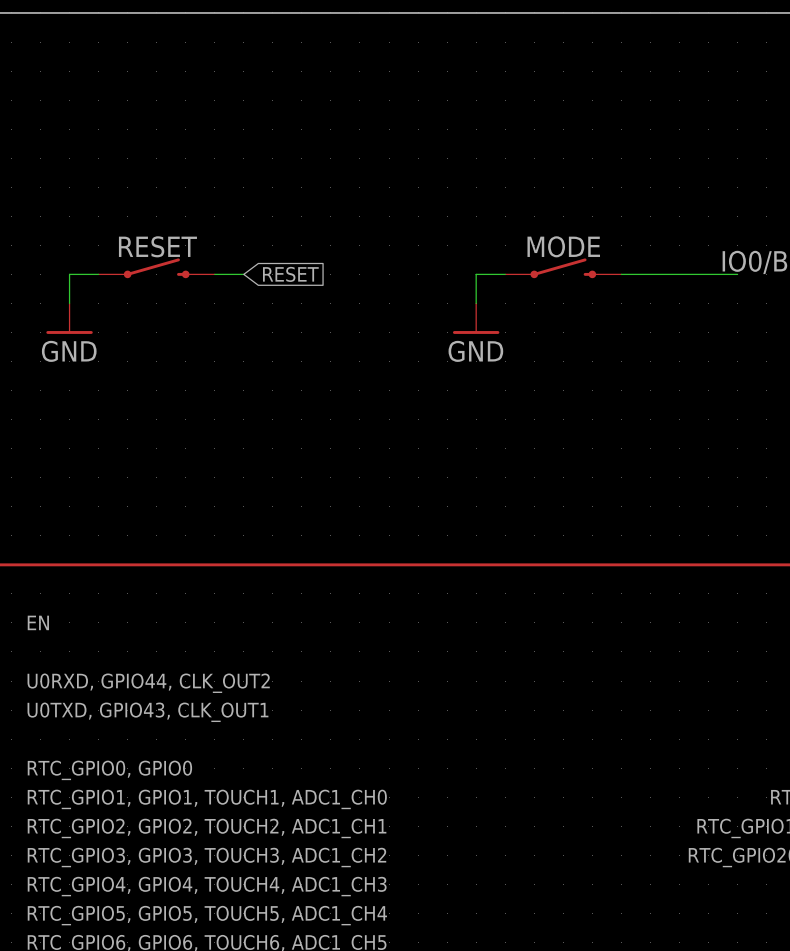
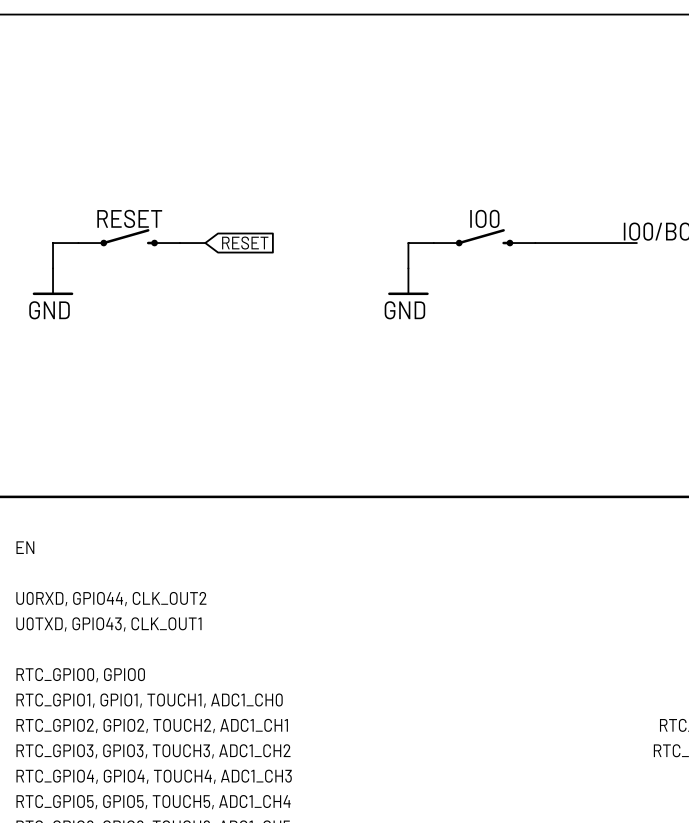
MODE name: MODE (563, 246) -> IO0 (484, 218)

